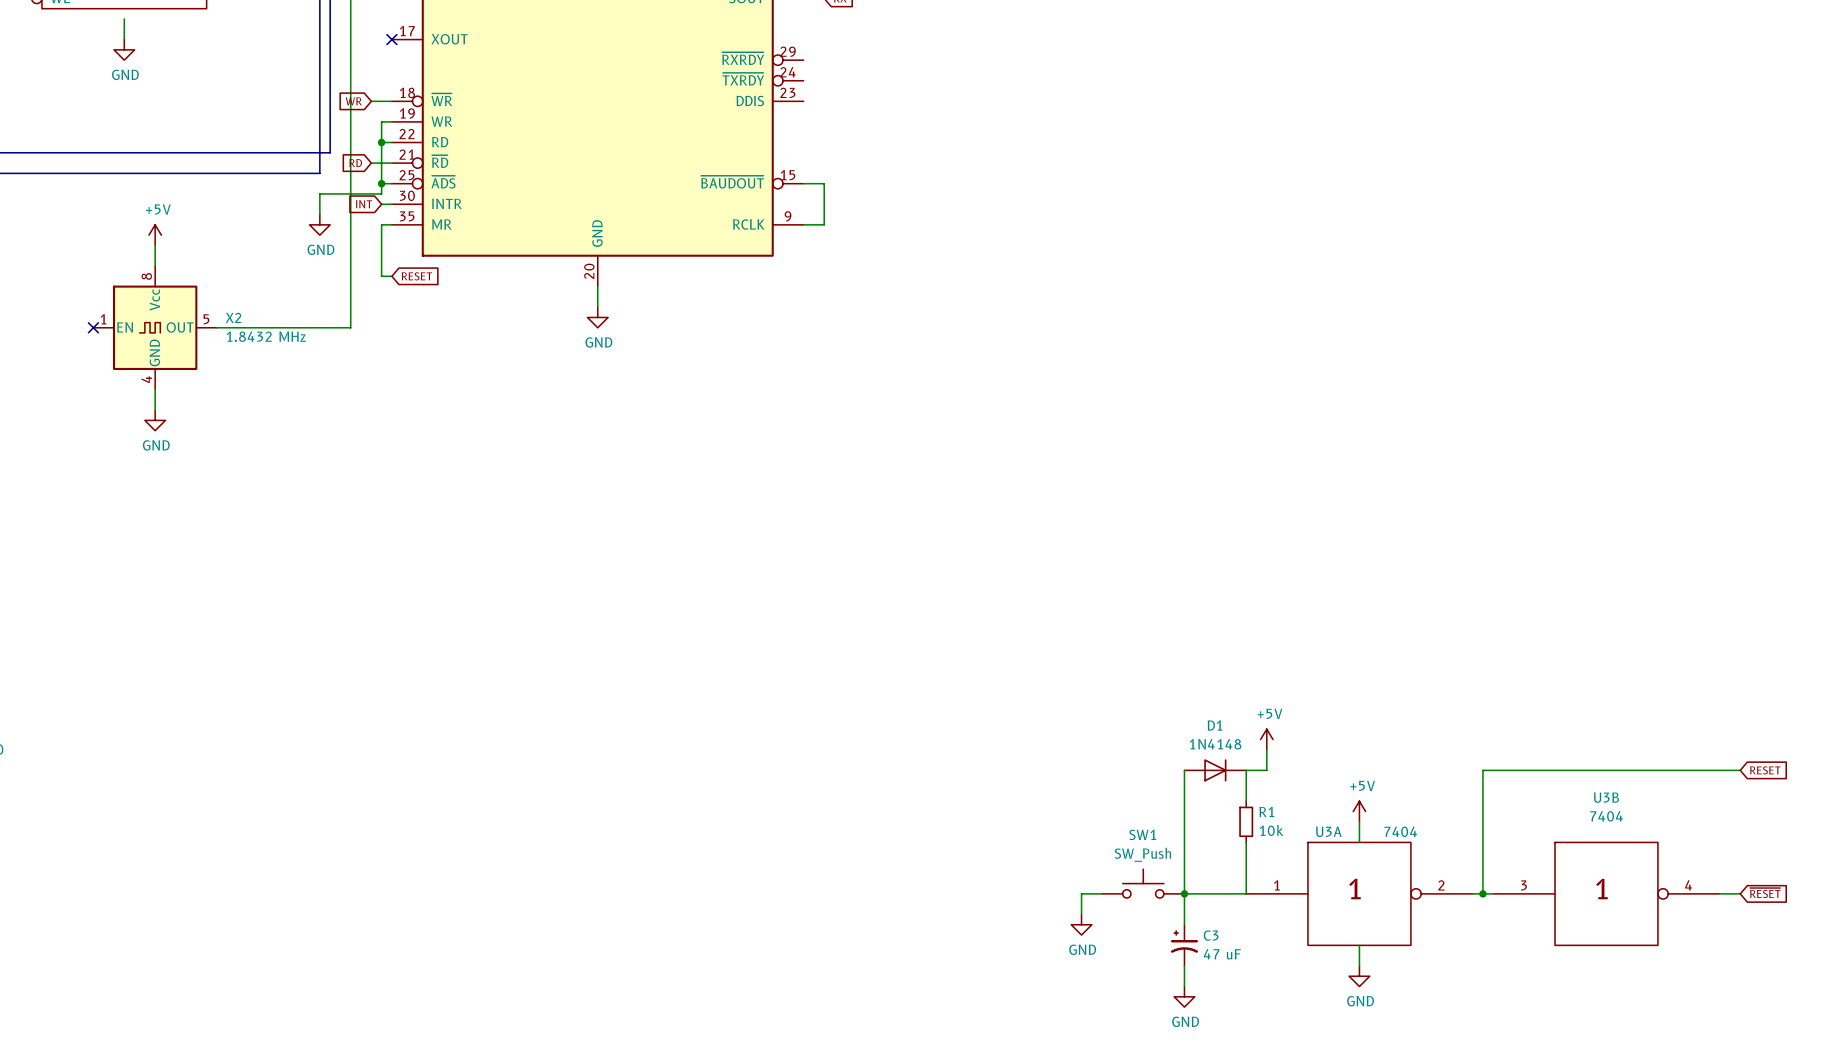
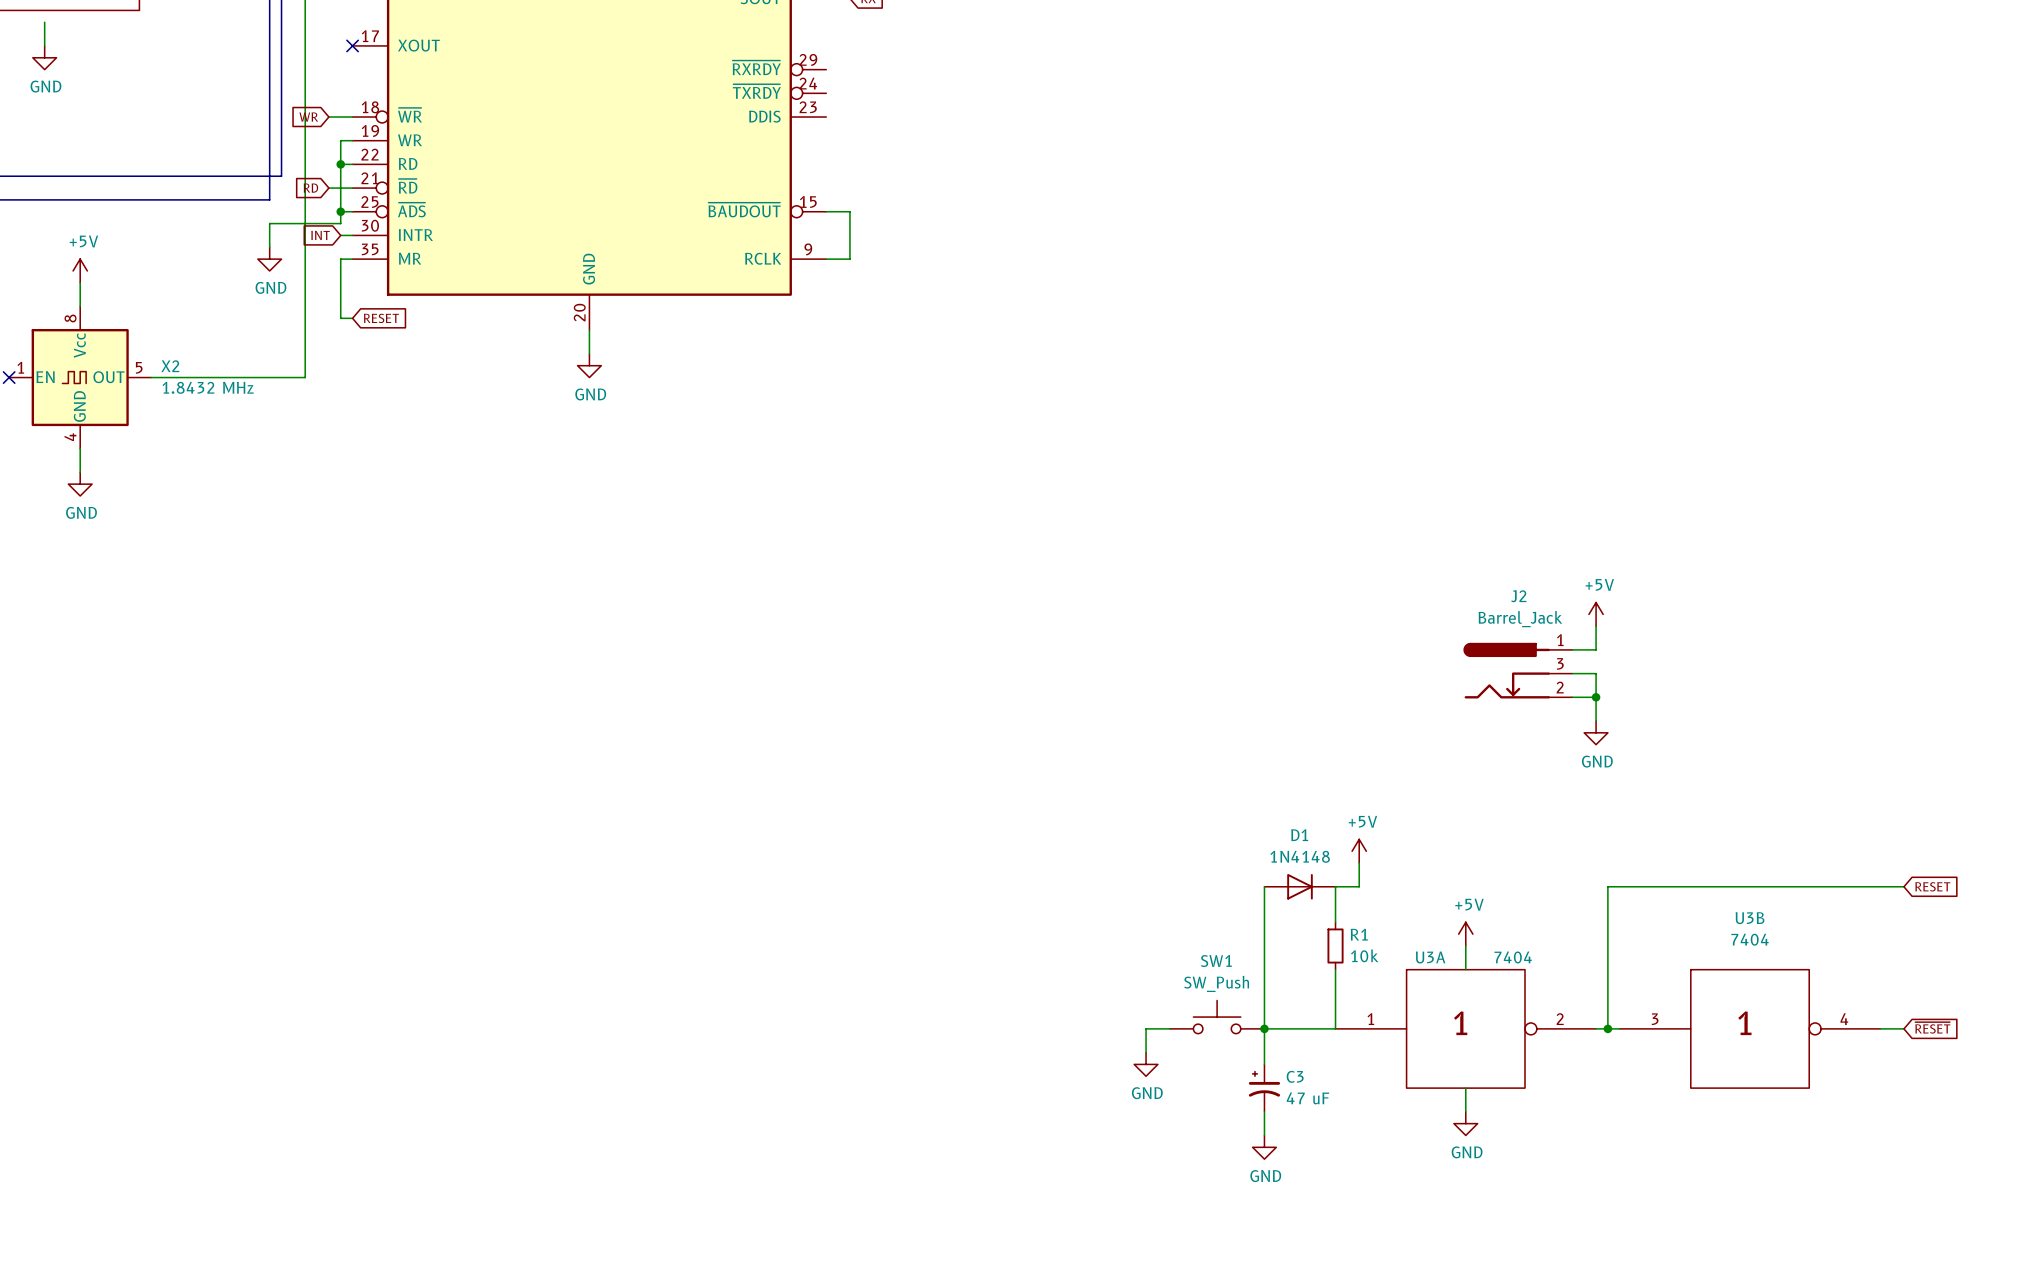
power symbol: none -> +5V (1596, 614)
wire: none -> (1596, 626) (1596, 649) (1572, 649)
J2: none -> Barrel_Jack (1517, 670)
wire: none -> (1572, 673) (1596, 673) (1596, 720)
wire: none -> (1572, 697) (1596, 697)
junction: none -> (1596, 697)
power symbol: none -> GND (1596, 732)

